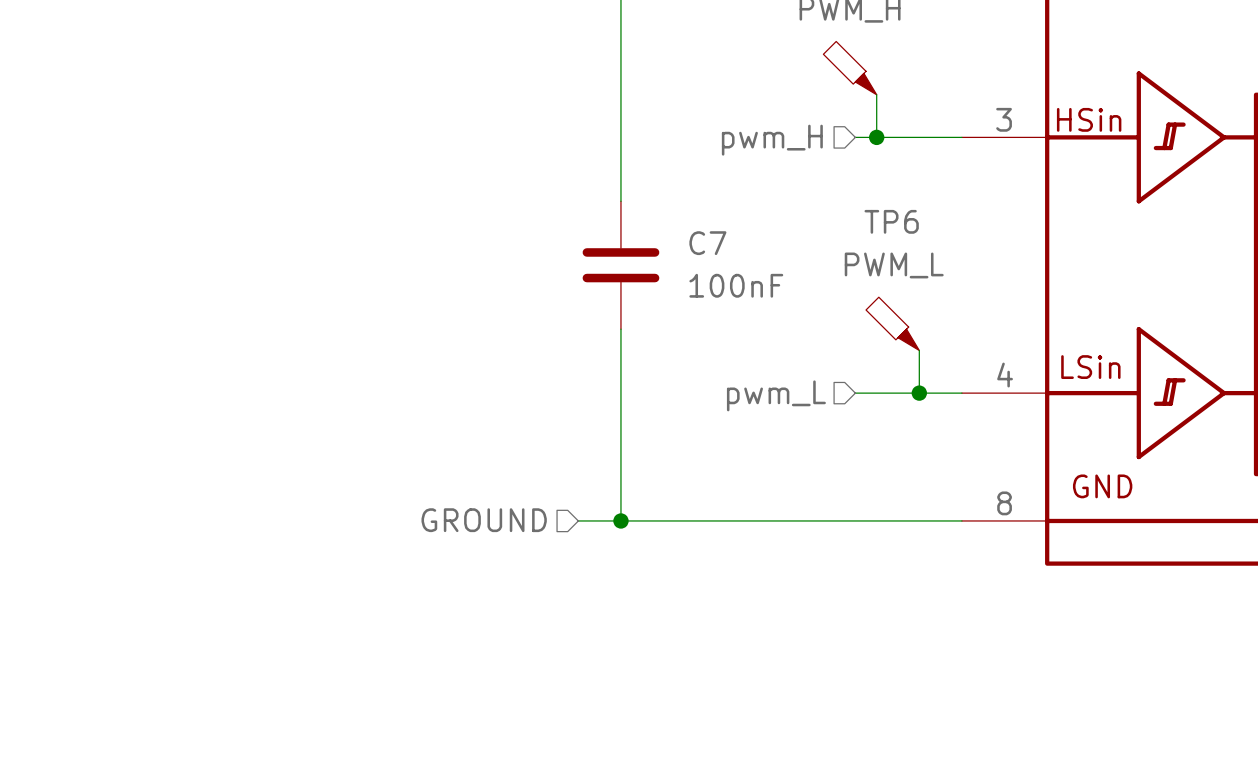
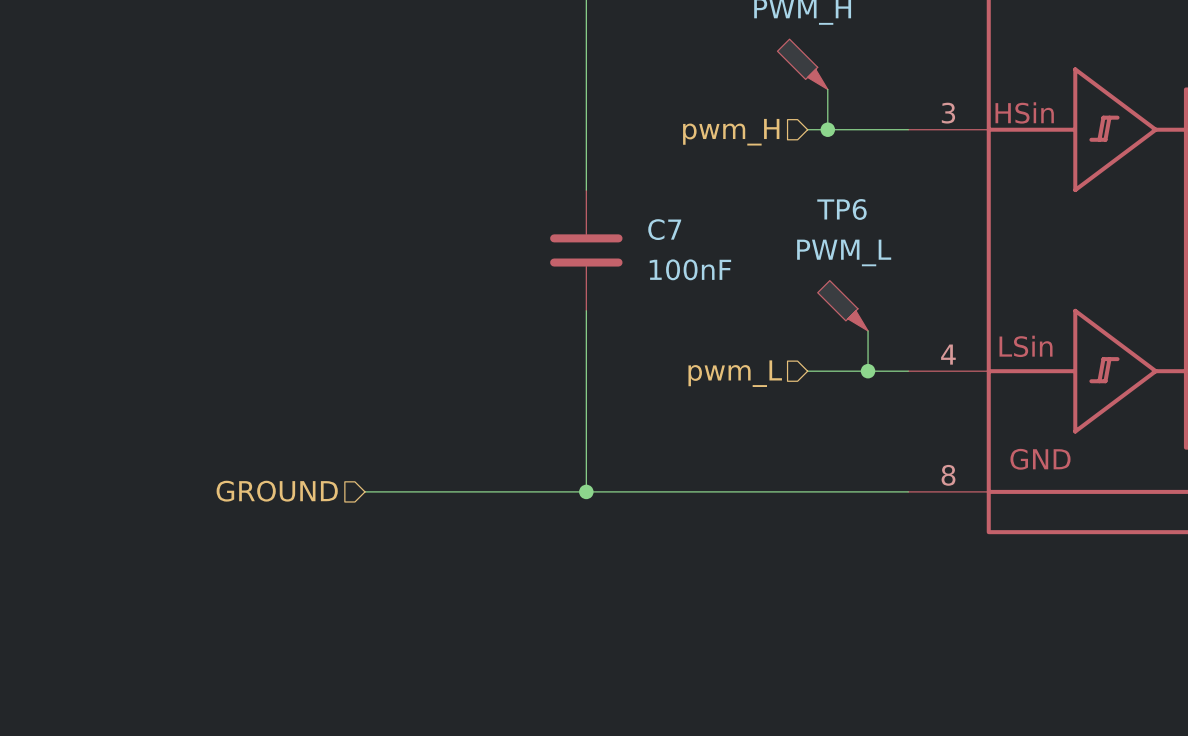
wire: none -> (364, 491) (546, 491)
hierarchical label position: GROUND (484, 520) -> GROUND (277, 491)

